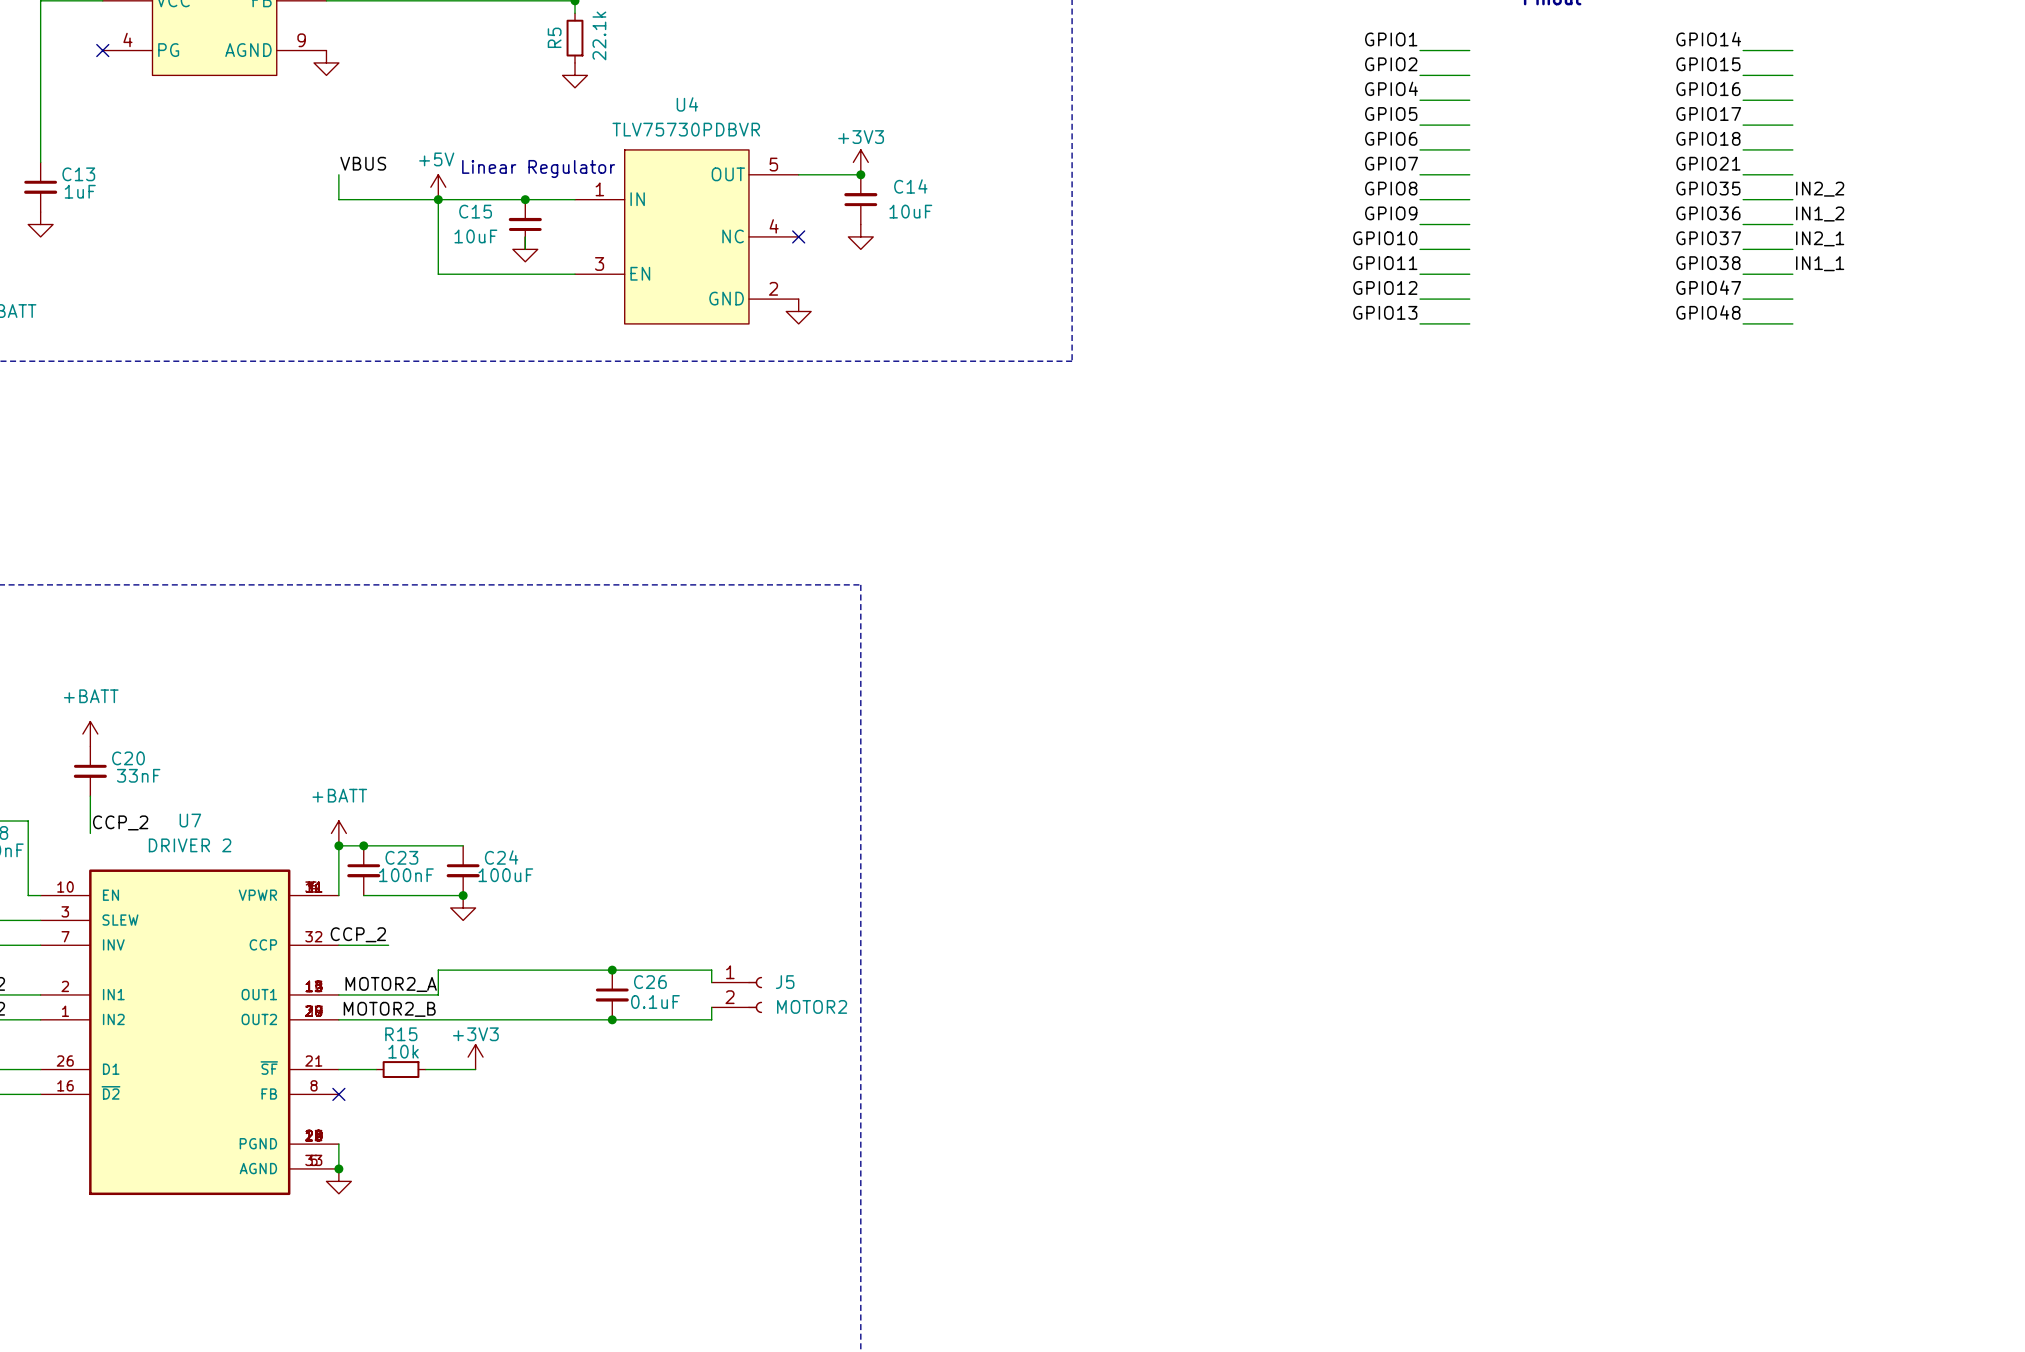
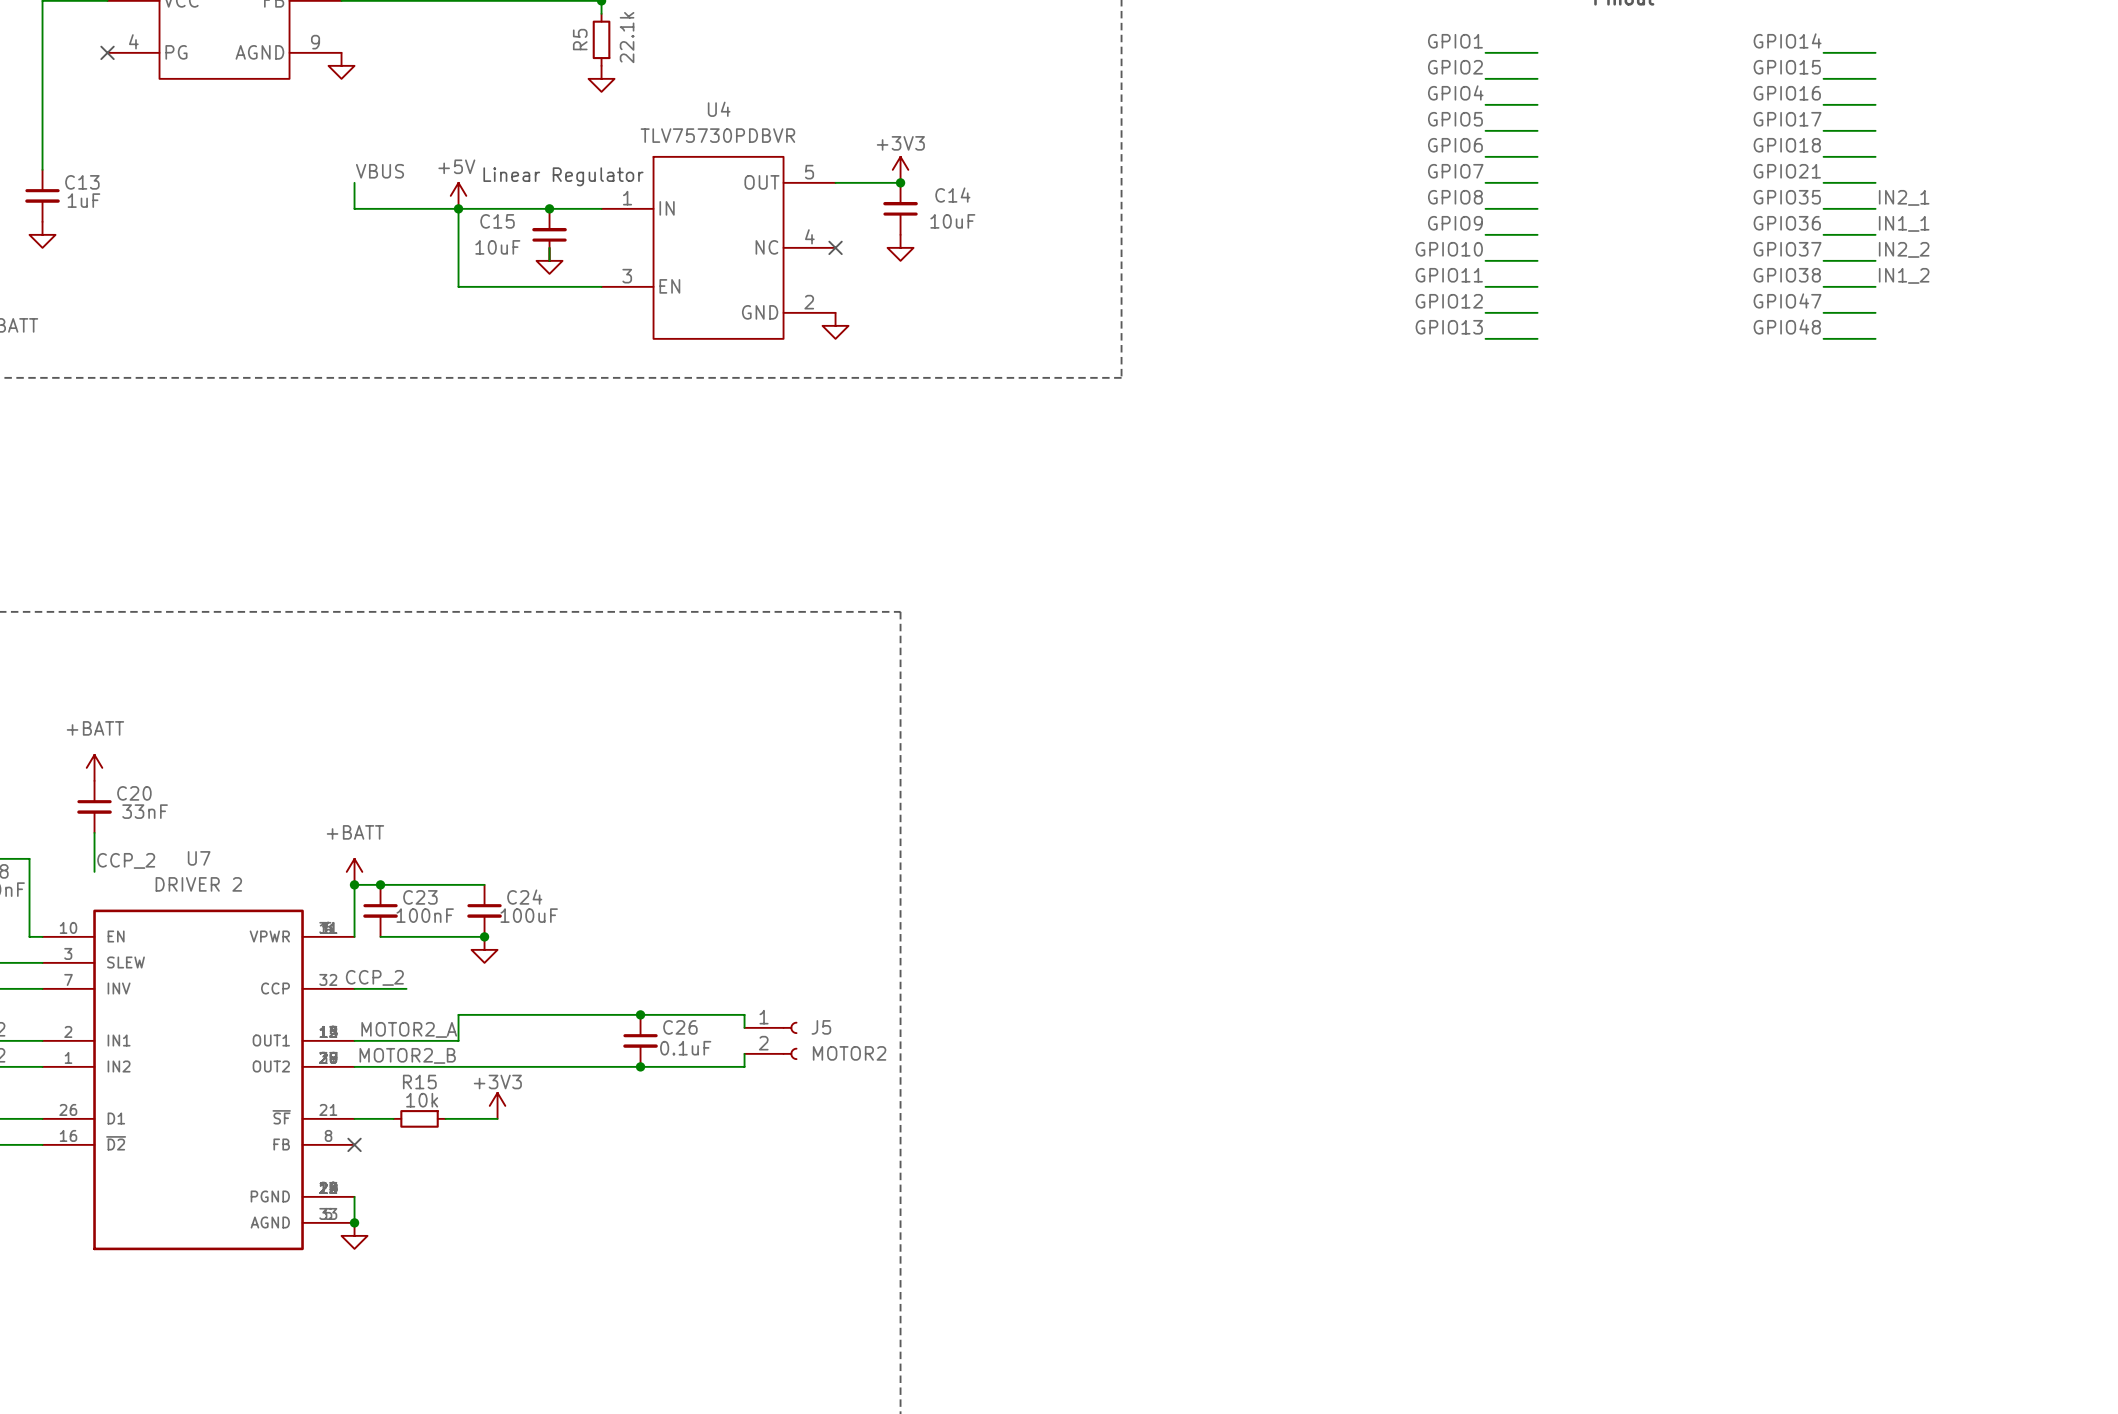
label: IN2_2 (1820, 189) -> IN2_1 (1904, 197)
label: IN1_2 (1820, 214) -> IN1_1 (1904, 223)
label: IN2_1 (1820, 238) -> IN2_2 (1904, 249)
label: IN1_1 (1820, 263) -> IN1_2 (1904, 275)

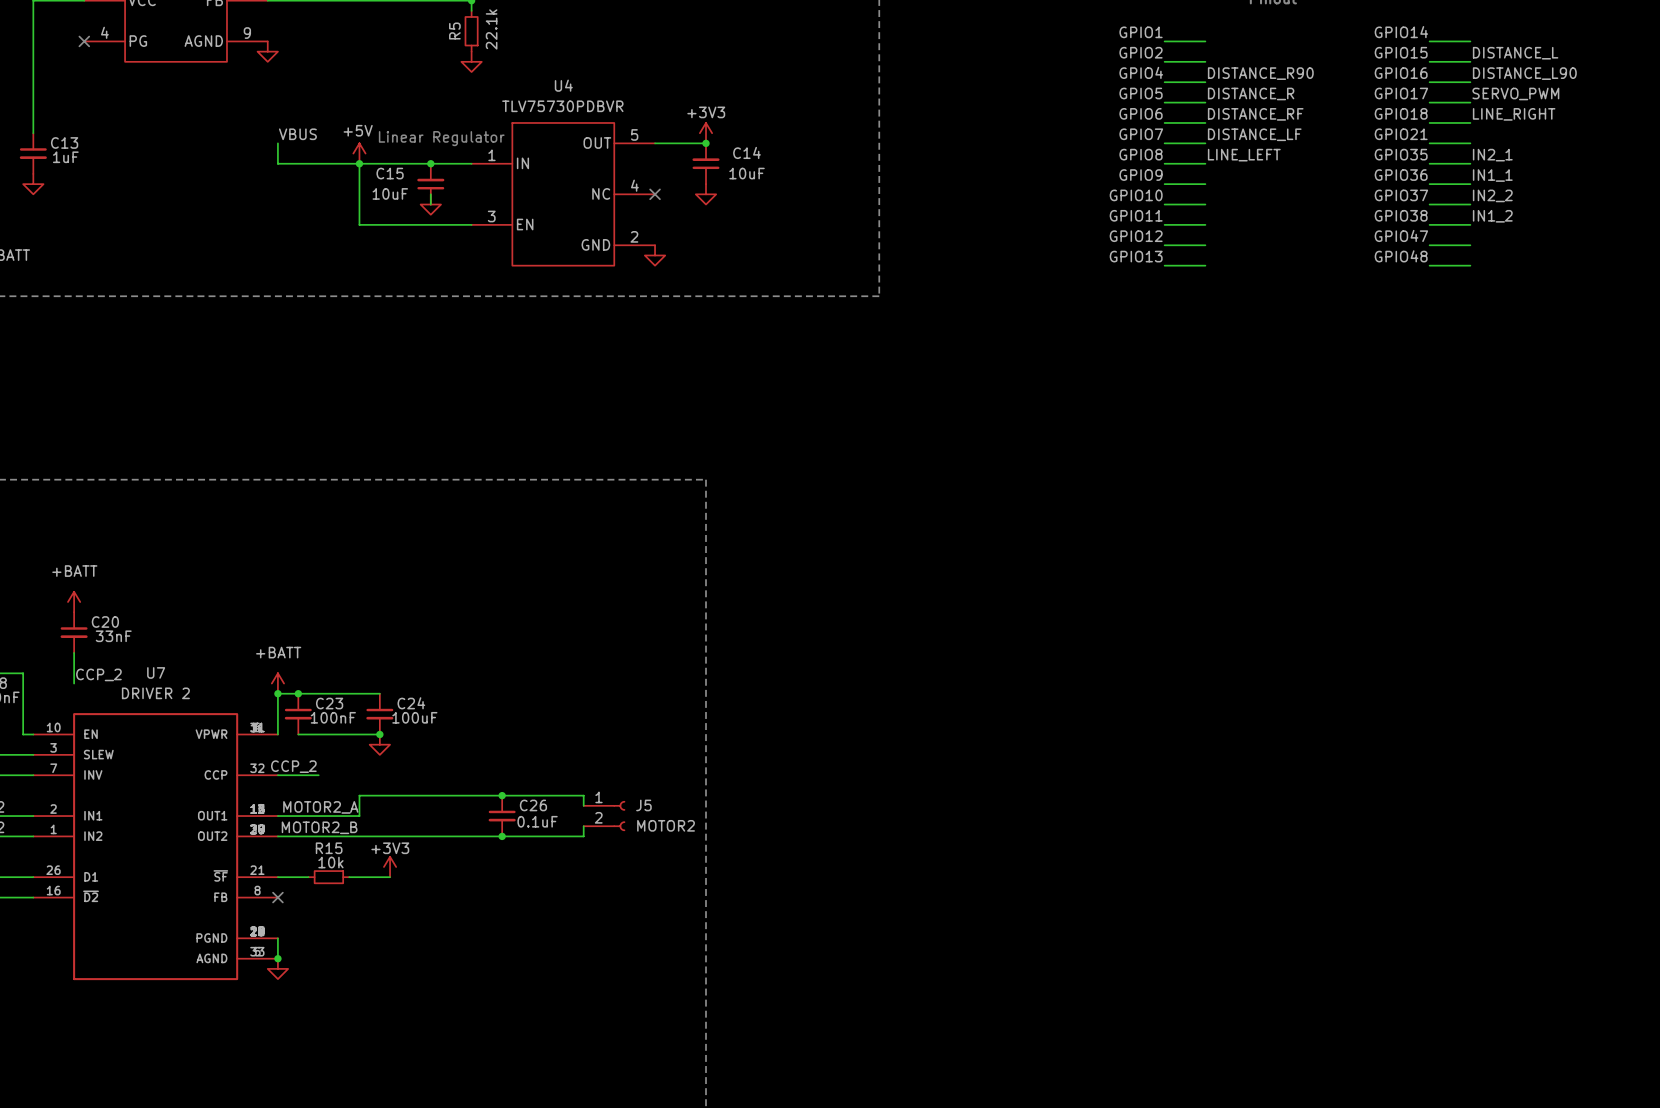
label: none -> DISTANCE_L (1515, 53)
label: none -> DISTANCE_R90 (1260, 73)
label: none -> DISTANCE_L90 (1524, 73)
label: none -> DISTANCE_R (1251, 93)
label: none -> SERVO_PWM (1515, 93)
label: none -> DISTANCE_RF (1255, 114)
label: none -> LINE_RIGHT (1514, 114)
label: none -> DISTANCE_LF (1254, 134)
label: none -> LINE_LEFT (1244, 155)

